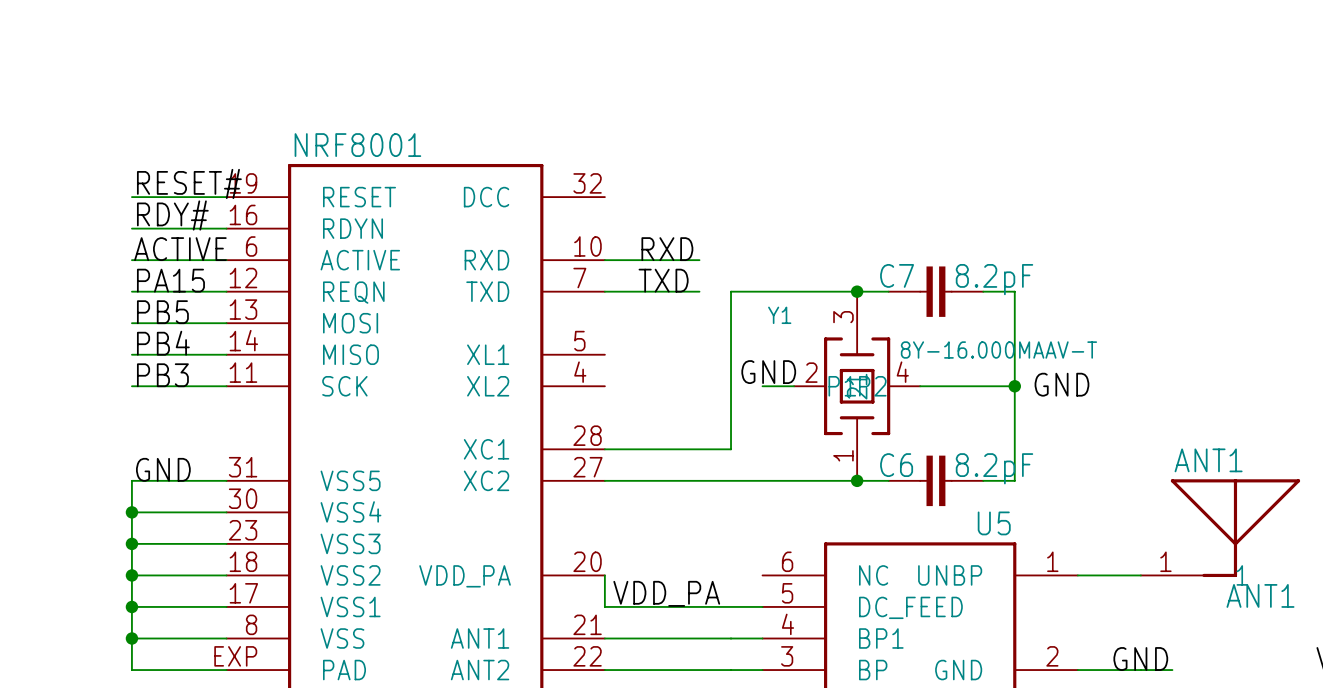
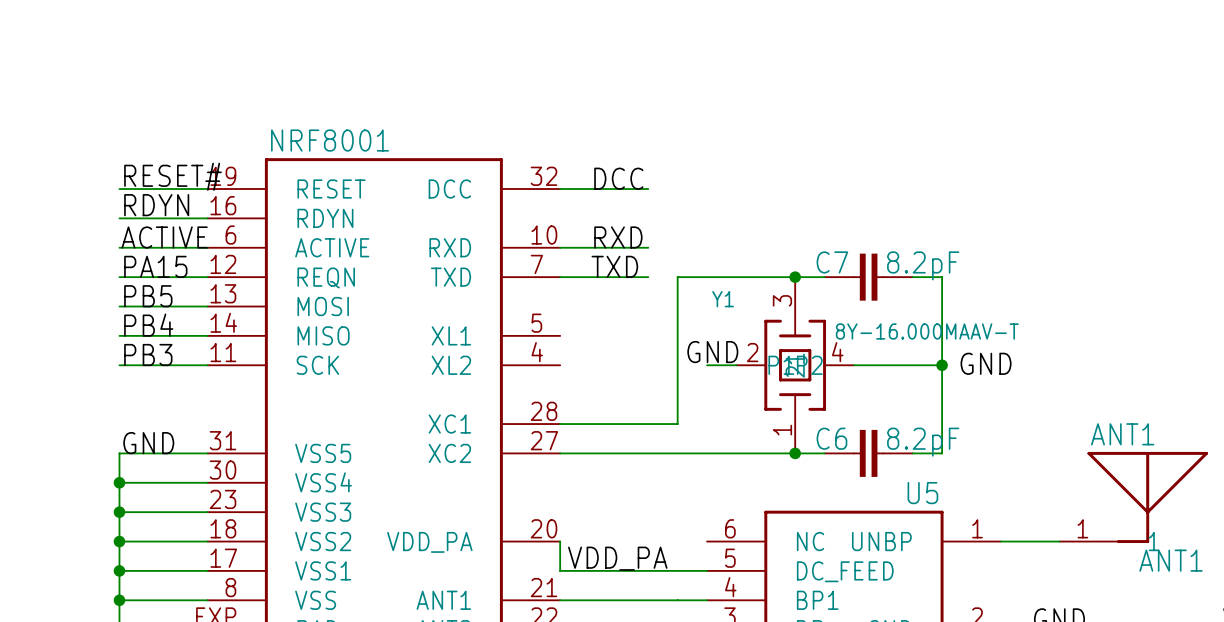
label: none -> DCC (618, 178)
wire: none -> (560, 189) (648, 189)
label: RDY# (172, 215) -> RDYN (156, 205)

